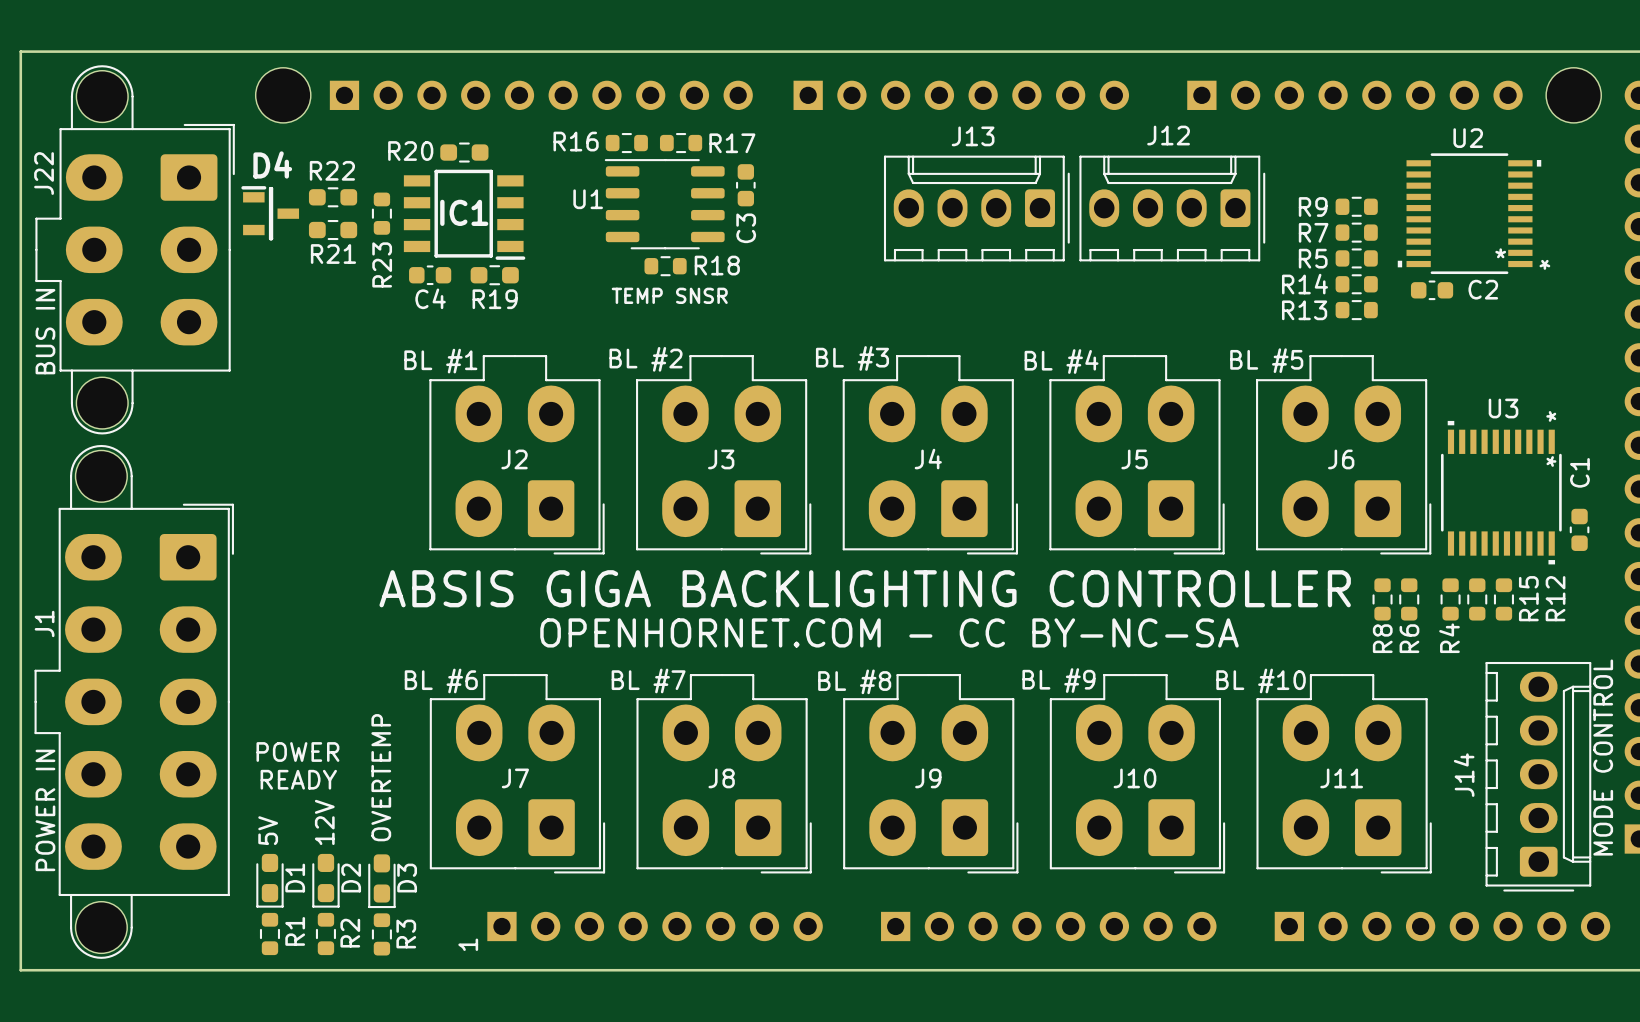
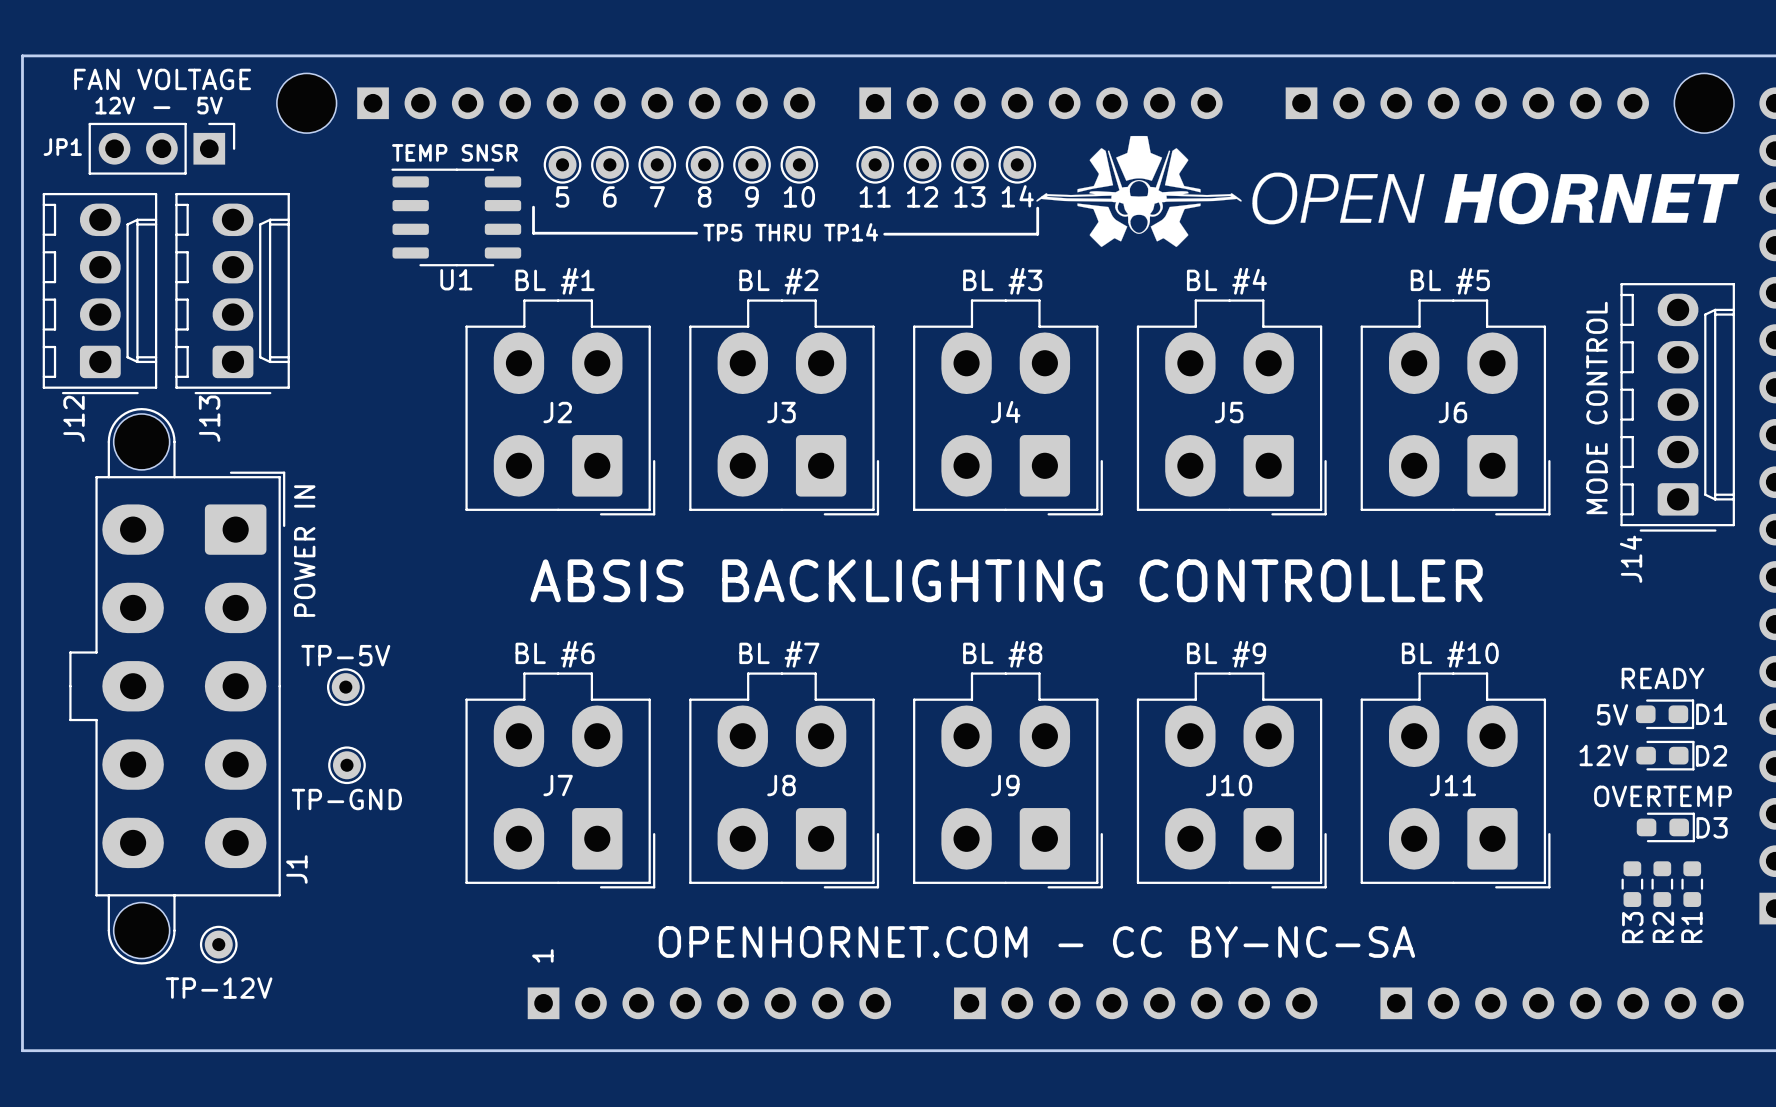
text: none -> 12V (115, 105)
text: none -> 5V (210, 105)
text: none -> - (161, 107)
drawing: none -> [1036, 135, 1740, 247]
J12 name position: J12 (1168, 135) -> J12 (74, 418)
J13 name position: J13 (973, 136) -> J13 (209, 418)
JP1: none -> (161, 148)
R16: (626, 143) -> none
R17: (681, 143) -> none
R20: (464, 152) -> none
part: none -> (562, 164)
part: none -> (609, 164)
part: none -> (657, 164)
part: none -> (704, 164)
part: none -> (752, 164)
part: none -> (799, 164)
part: none -> (875, 164)
part: none -> (922, 164)
part: none -> (969, 164)
part: none -> (1017, 164)
C3: (745, 185) -> none
line: none -> (533, 207) (533, 233) (696, 233)
line: none -> (1037, 208) (1037, 234) (884, 234)
R22: (333, 197) -> none
U1 name position: U1 (588, 199) -> U1 (456, 279)
U1 position: (664, 204) -> (456, 217)
R9: (1356, 206) -> none
J13 rotation: 0° (976, 208) -> 90° clockwise (232, 293)
J13 position: (976, 208) -> (232, 293)
J12 rotation: 0° (1172, 208) -> 90° clockwise (99, 293)
J12 position: (1172, 208) -> (99, 293)
D4: (270, 213) -> none
R23: (381, 213) -> none
U2: (1469, 213) -> none
IC1: (464, 214) -> none
text: none -> TP5 THRU TP14 (790, 232)
R21: (333, 230) -> none
R7: (1356, 232) -> none
J22: (135, 249) -> none
R5: (1356, 258) -> none
R18: (665, 266) -> none
C4: (430, 275) -> none
R19: (494, 275) -> none
R14: (1356, 284) -> none
C2: (1432, 290) -> none
text position: TEMP SNSR (669, 295) -> TEMP SNSR (454, 152)
R13: (1356, 310) -> none
J4 text position: BL #3 (852, 358) -> BL #3 (1002, 281)
J3 text position: BL #2 (646, 359) -> BL #2 (778, 281)
J6 text position: BL #5 (1266, 360) -> BL #5 (1450, 281)
J2 text position: BL #1 (440, 361) -> BL #1 (555, 281)
J5 text position: BL #4 (1061, 361) -> BL #4 (1226, 281)
J2 position: (517, 454) -> (560, 407)
J3 position: (723, 454) -> (784, 407)
J4 position: (930, 454) -> (1007, 407)
J5 position: (1137, 454) -> (1231, 407)
J6 position: (1343, 454) -> (1455, 407)
U3: (1501, 492) -> none
C1: (1579, 529) -> none
text: ABSIS GIGA BACKLIGHTING CONTROLLER (865, 588) -> ABSIS BACKLIGHTING CONTROLLER (1006, 580)
R8: (1382, 599) -> none
R6: (1409, 599) -> none
R4: (1450, 599) -> none
R15: (1477, 599) -> none
R12: (1503, 599) -> none
J1 name position: J1 (44, 623) -> J1 (296, 869)
text: none -> READY (1662, 678)
text position: OPENHORNET.COM - CC BY-NC-SA (889, 632) -> OPENHORNET.COM - CC BY-NC-SA (1036, 942)
part: none -> (345, 687)
J7 text position: BL #6 (441, 680) -> BL #6 (555, 654)
J8 text position: BL #7 (648, 680) -> BL #7 (779, 654)
J10 text position: BL #9 (1058, 680) -> BL #9 (1226, 654)
J11 text position: BL #10 (1261, 680) -> BL #10 (1450, 654)
J9 text position: BL #8 (854, 681) -> BL #8 (1002, 654)
J1 position: (134, 701) -> (177, 686)
part: none -> (346, 765)
text: POWER (297, 751) -> none
text position: MODE CONTROL (1603, 757) -> MODE CONTROL (1596, 407)
J7 position: (517, 773) -> (560, 780)
J8 position: (724, 773) -> (784, 780)
J9 position: (930, 773) -> (1007, 780)
J10 position: (1137, 773) -> (1231, 780)
J11 position: (1344, 773) -> (1455, 780)
J14 name position: J14 (1464, 775) -> J14 (1631, 559)
J14 position: (1538, 776) -> (1677, 407)
text: READY (298, 779) -> none
J1 text position: POWER IN (45, 810) -> POWER IN (304, 551)
D3 footprint: [368, 854, 396, 909] -> [1636, 812, 1695, 843]
part: none -> (218, 944)
D1 rotation: 0° (269, 880) -> 90° counterclockwise (1665, 714)
D1 position: (269, 880) -> (1665, 714)
D2 rotation: 0° (325, 880) -> 90° counterclockwise (1665, 755)
D2 position: (325, 880) -> (1665, 755)
R1 name position: R1 (295, 931) -> R1 (1691, 927)
R1 position: (269, 933) -> (1692, 884)
R2 position: (325, 933) -> (1662, 884)
R2 name position: R2 (350, 933) -> R2 (1663, 927)
R3 position: (381, 934) -> (1632, 884)
R3 name position: R3 (406, 934) -> R3 (1632, 927)
text position: 1 (468, 944) -> 1 (542, 955)

